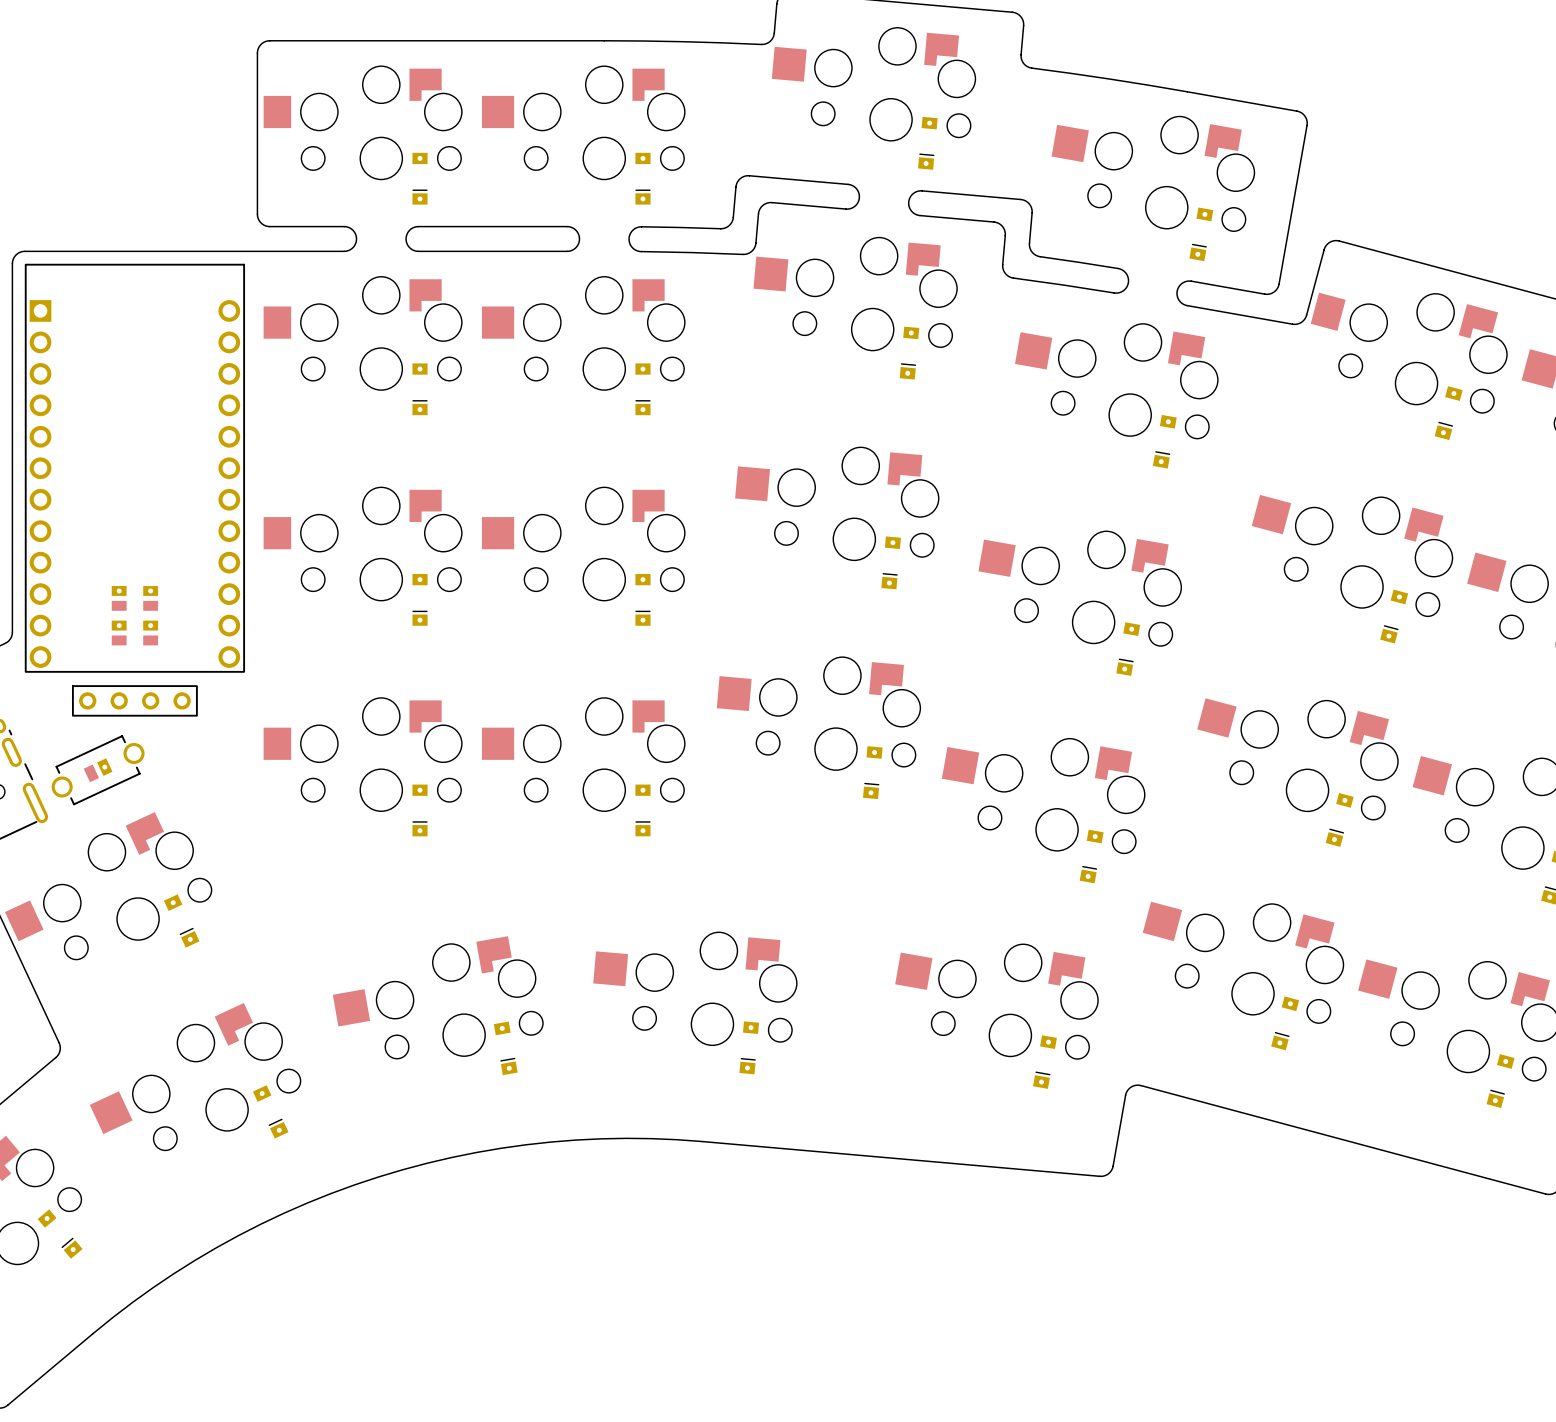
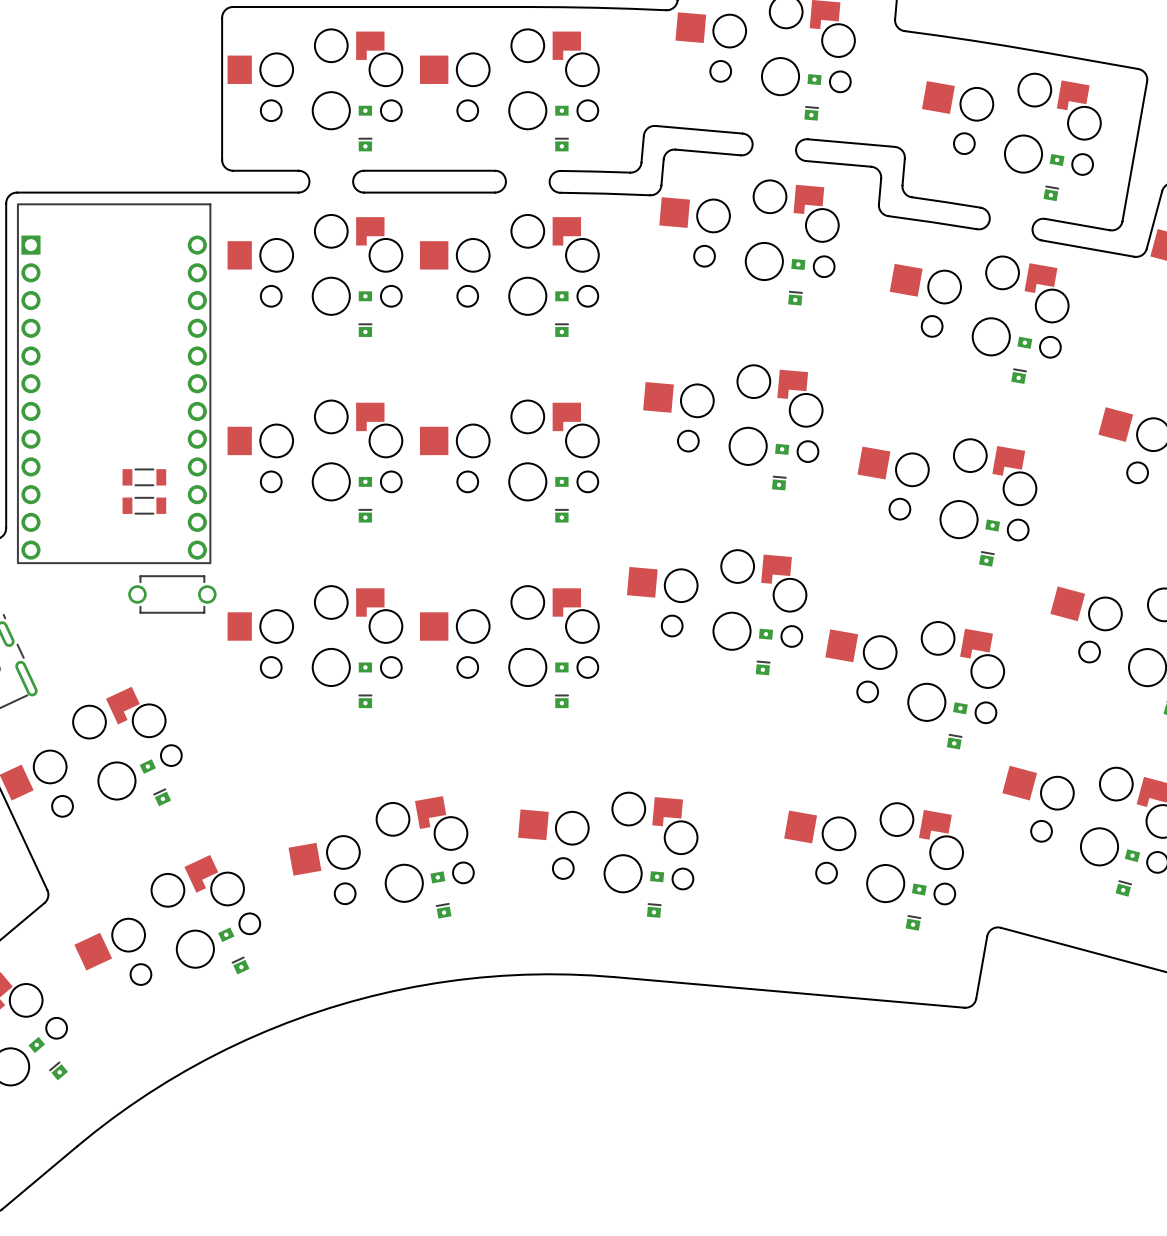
part: none -> (144, 477)
part: (119, 598) -> none
part: (150, 598) -> none
part: none -> (144, 505)
part: (119, 633) -> none
part: (150, 633) -> none
part: (134, 700) -> none
part: none -> (172, 594)
part: (98, 770) -> none
part: (98, 770) -> none

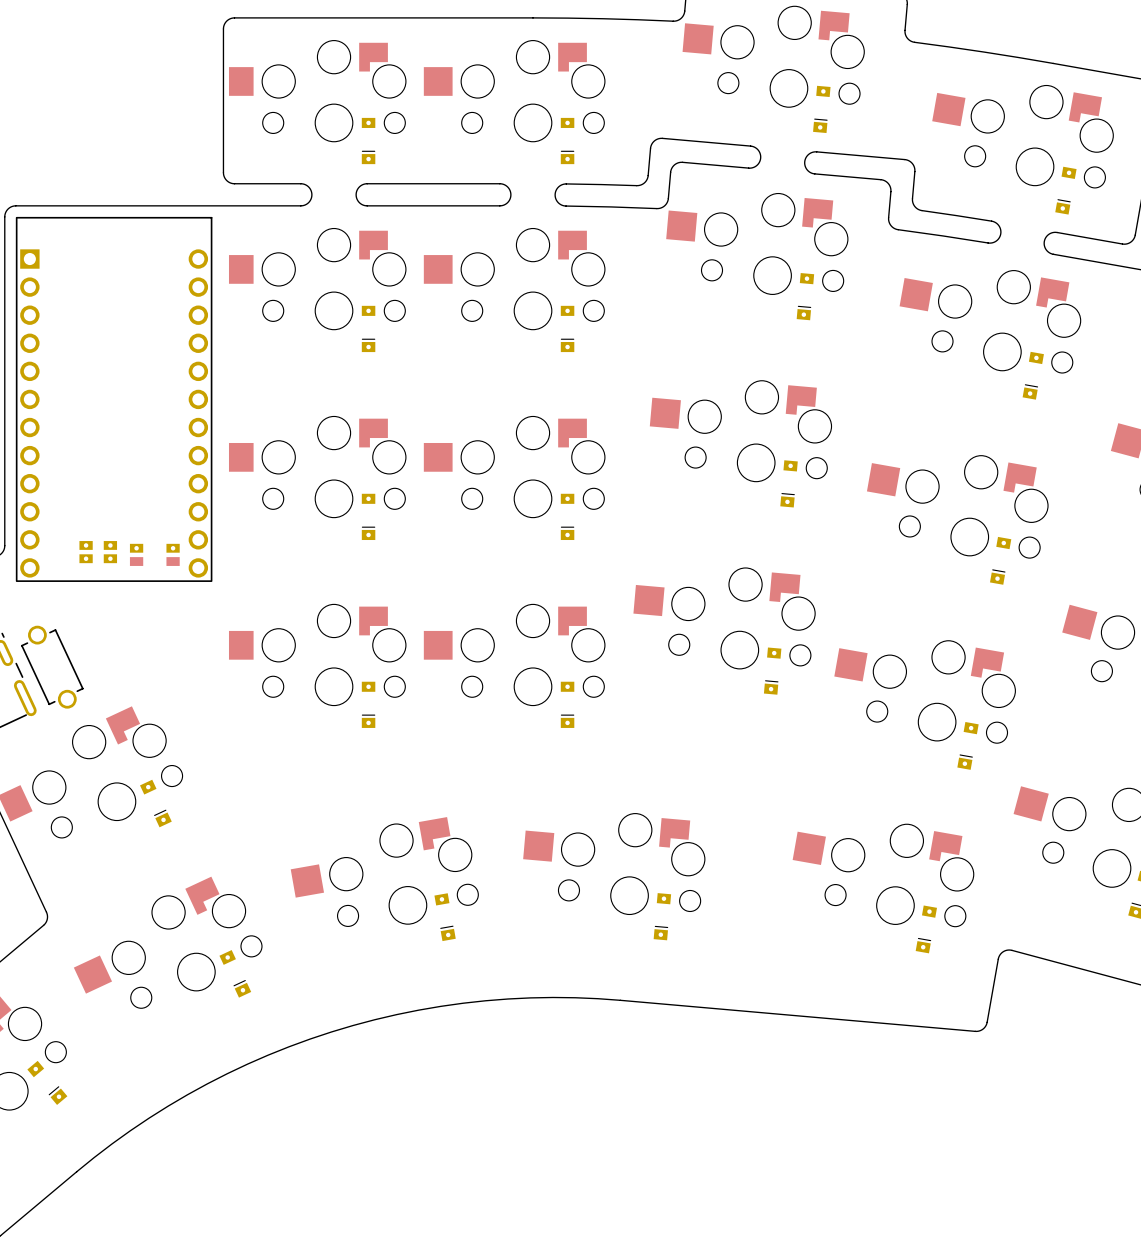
part: (144, 477) -> none
part: (144, 505) -> none
part: none -> (86, 552)
part: none -> (110, 552)
part: none -> (136, 554)
part: none -> (173, 554)
part: (172, 594) -> none
part: none -> (52, 667)

